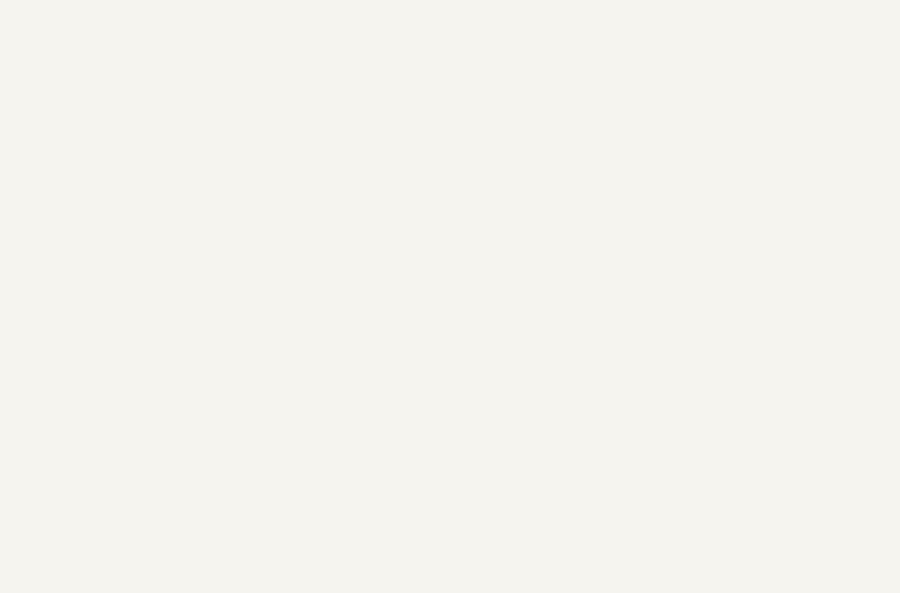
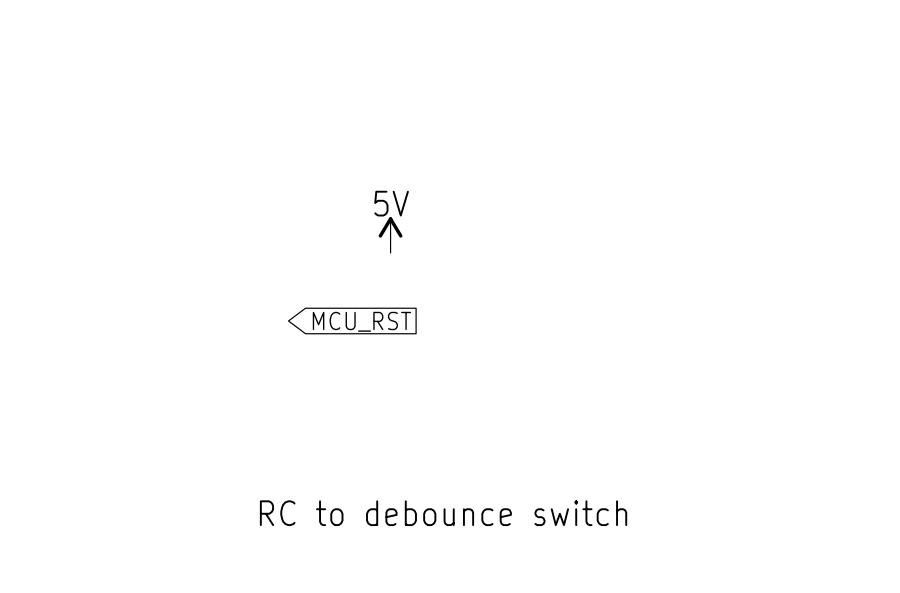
power symbol: none -> 5V (390, 235)
global label: none -> MCU_RST (361, 321)
text: none -> RC to debounce switch (443, 513)

